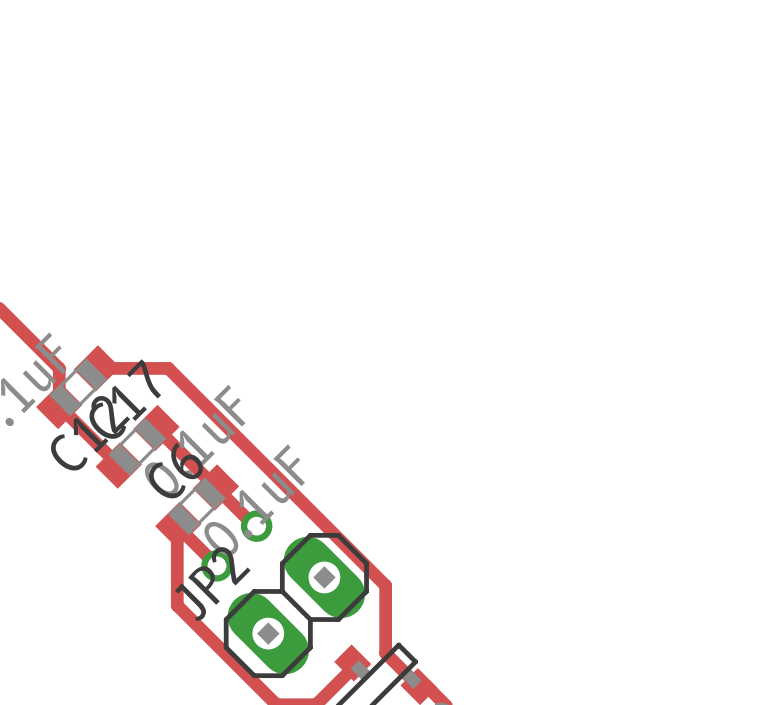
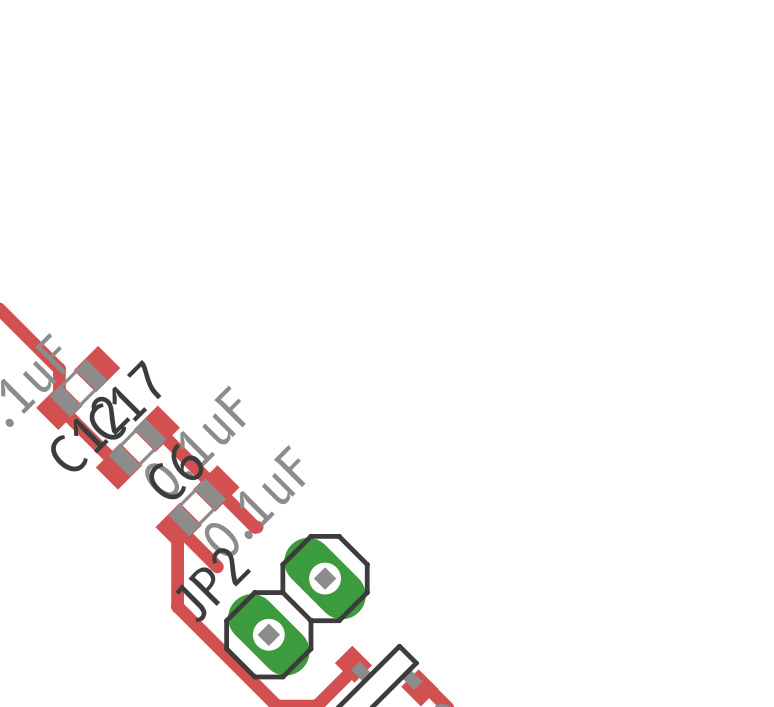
track: (96, 368) (168, 368) (385, 585) (385, 653) (418, 686) -> none
via: (256, 526) -> none
via: (216, 565) -> none

